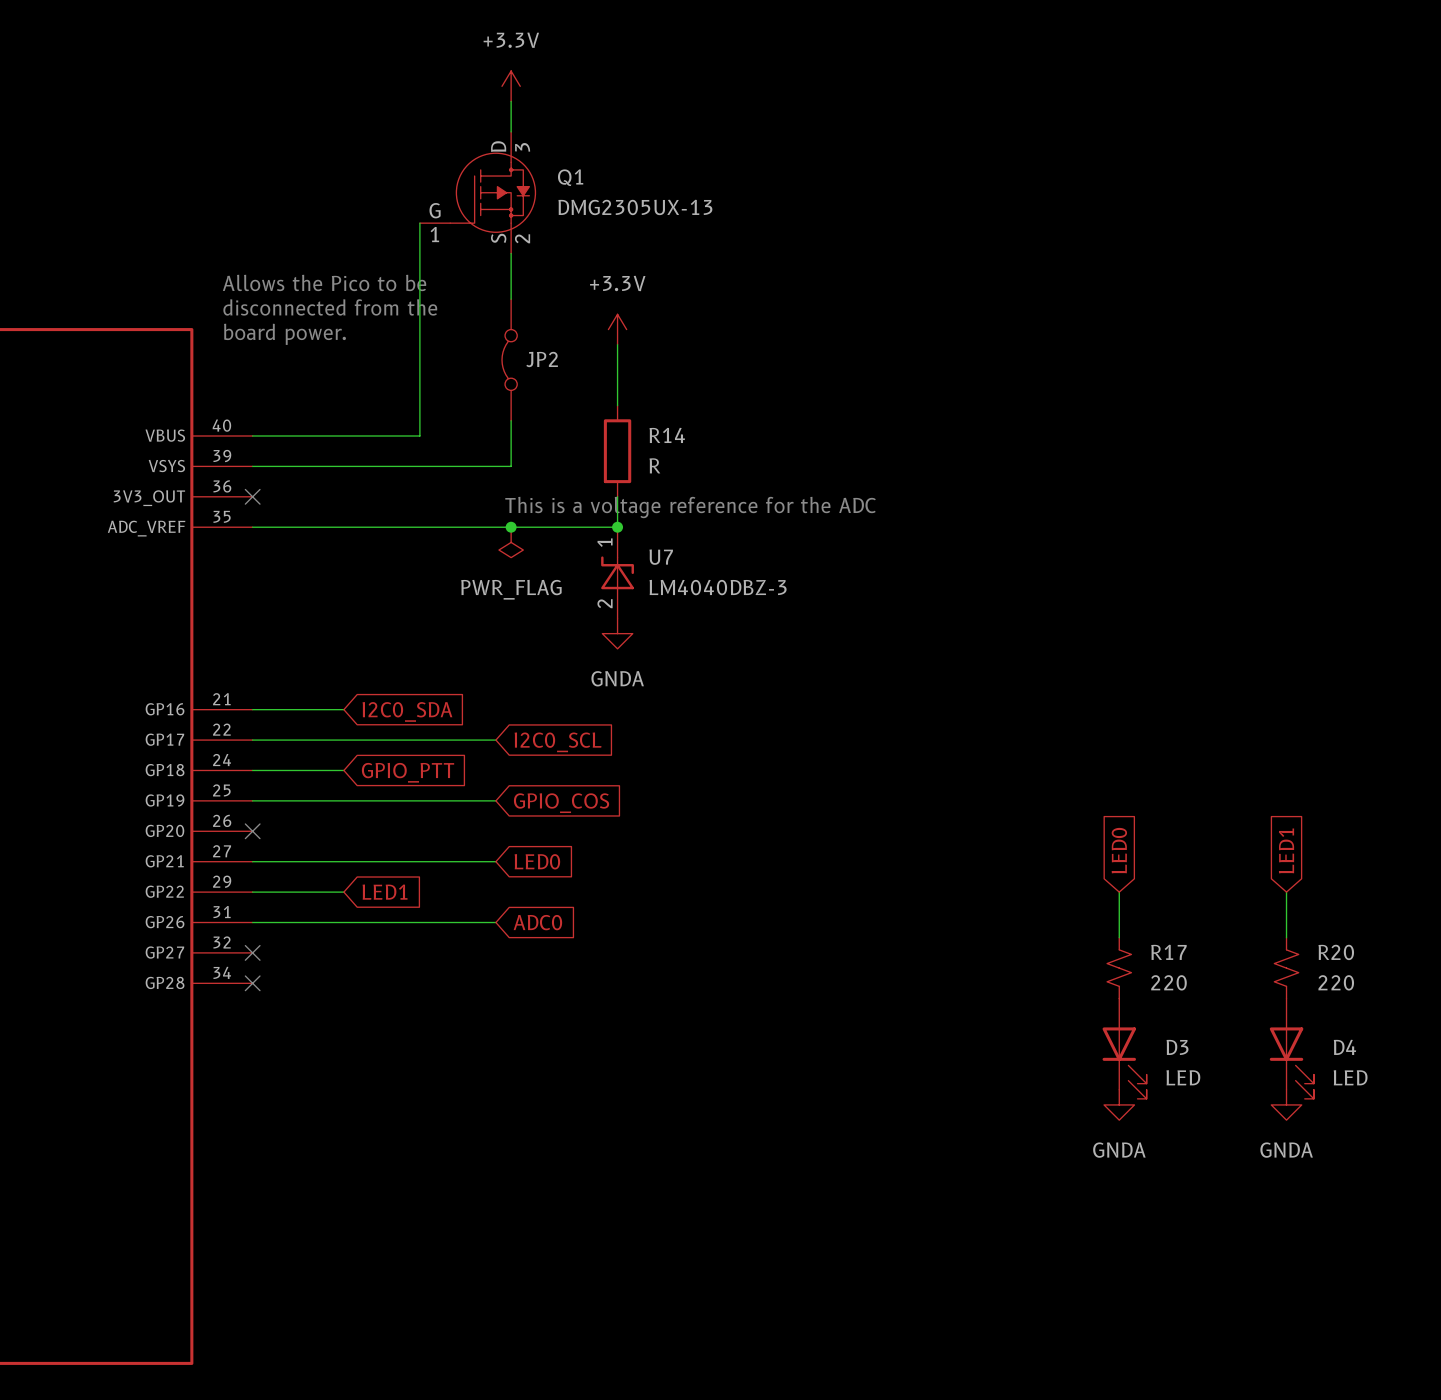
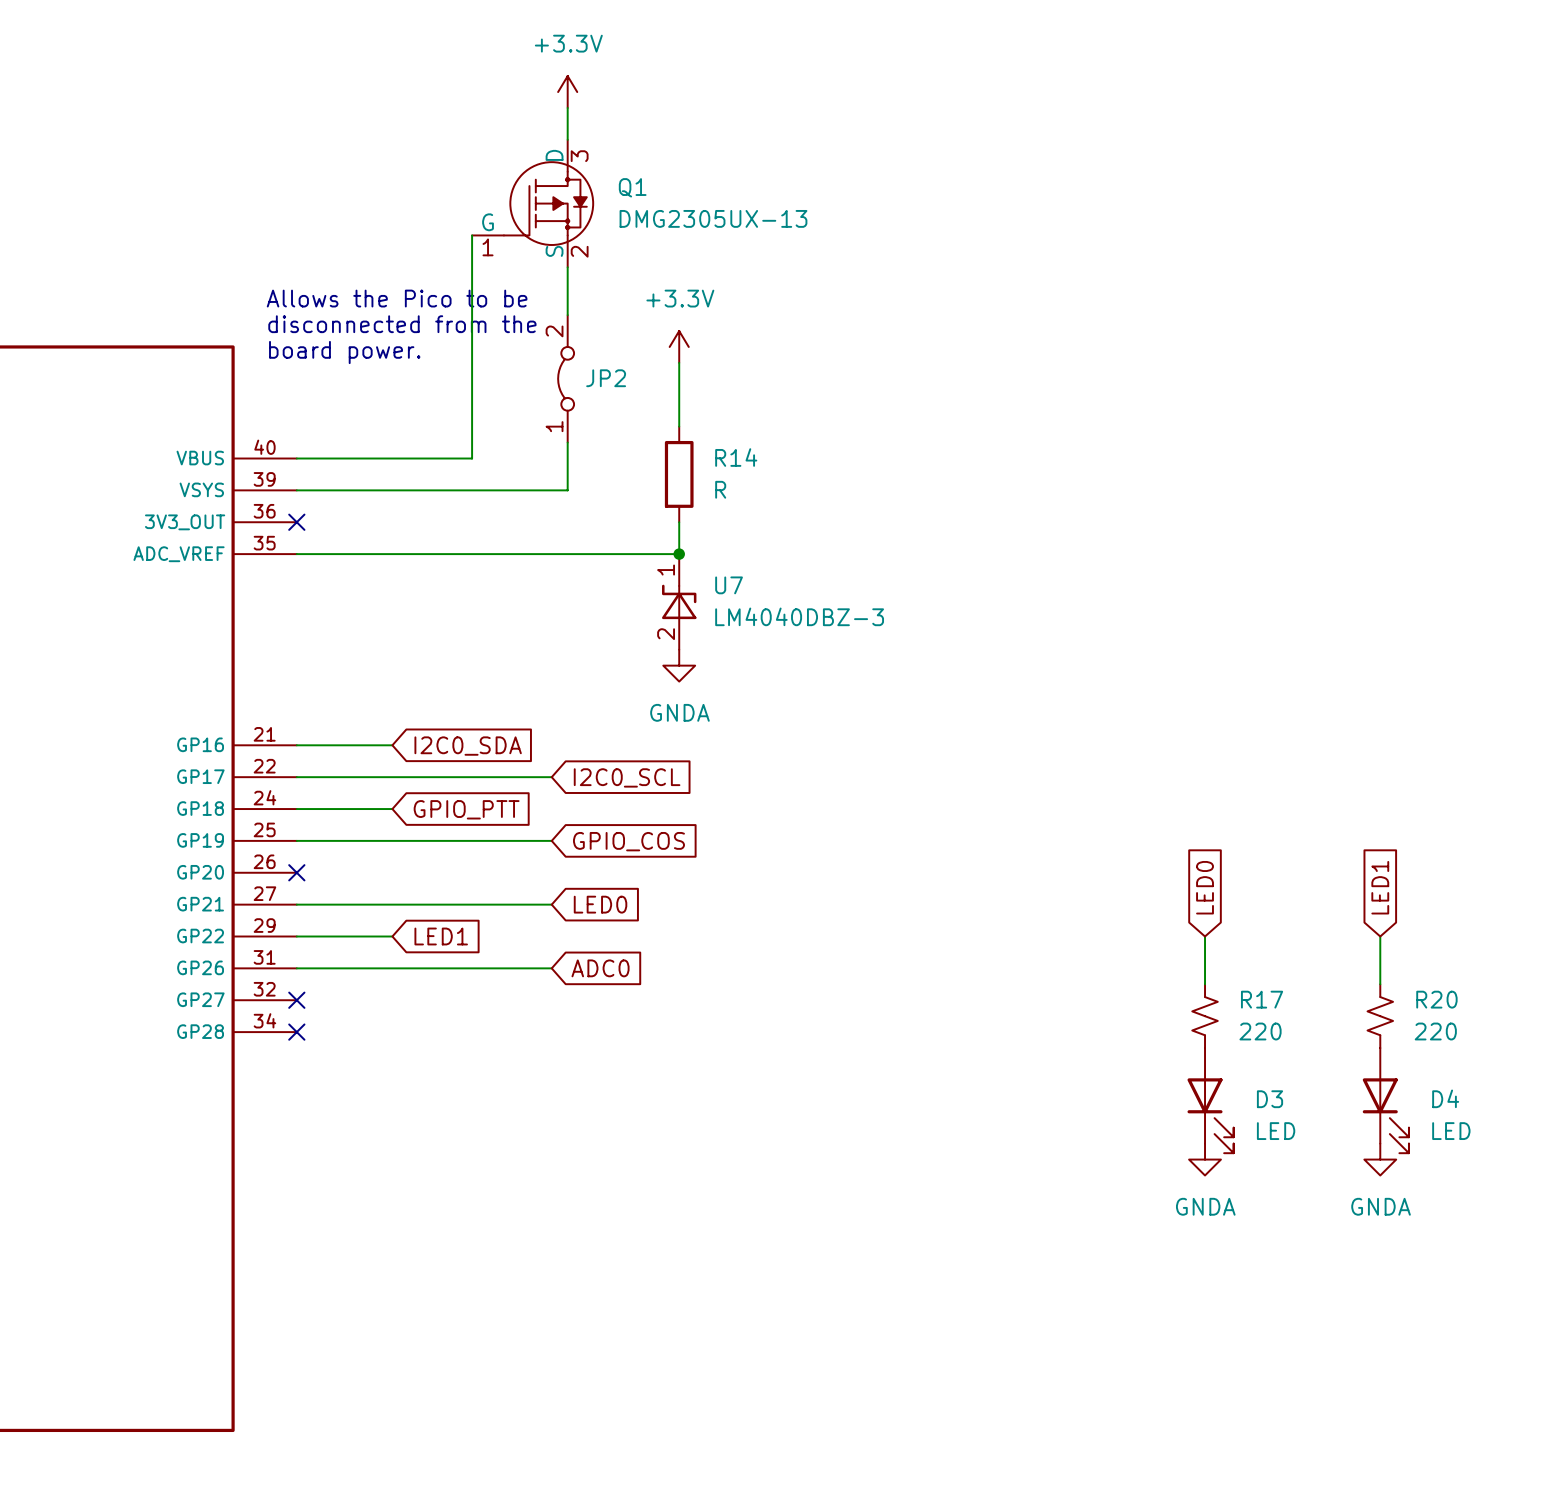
JP2 pin number: none -> 2 (554, 331)
JP2 pin number: none -> 1 (554, 426)
text: This is a voltage reference for the ADC (690, 507) -> none
junction: (511, 527) -> none
power symbol: PWR_FLAG (511, 542) -> none

